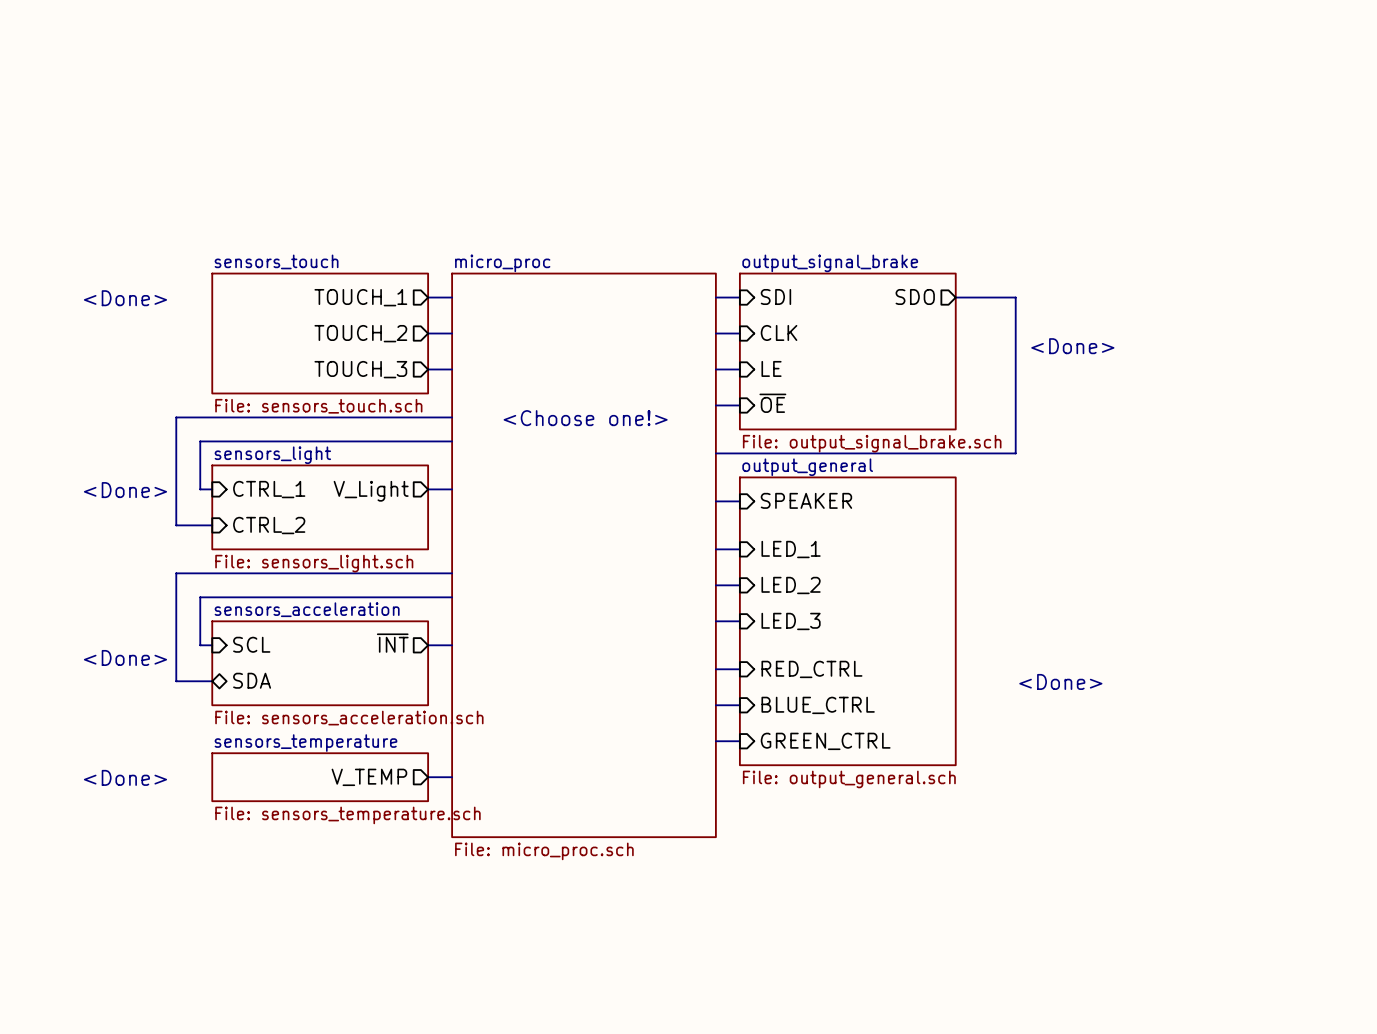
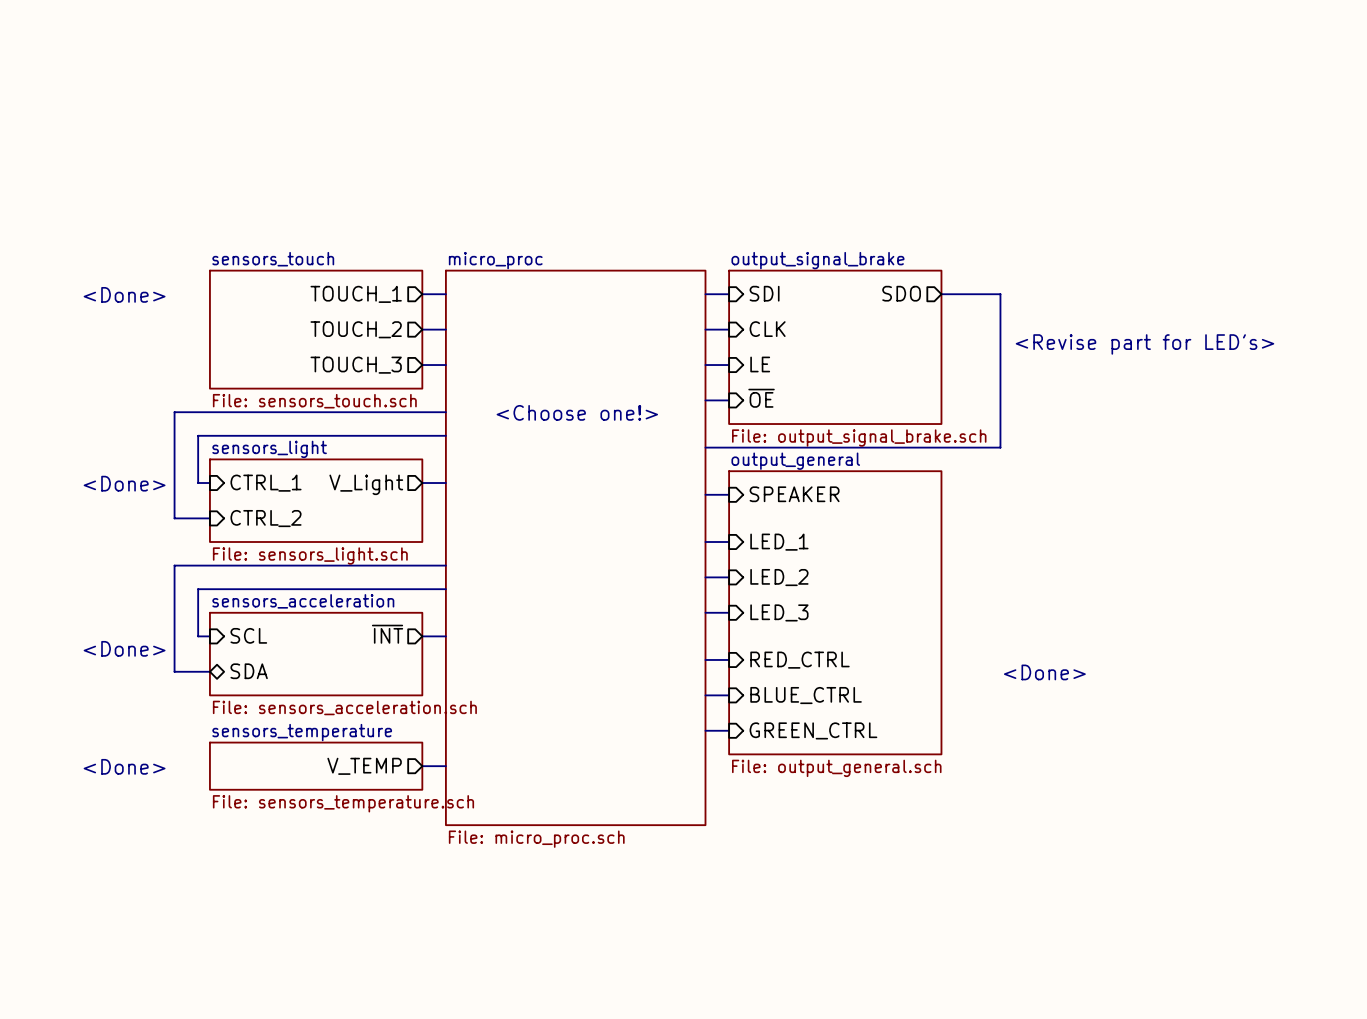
text: <Done> (1072, 346) -> <Revise part for LED's> (1144, 344)

